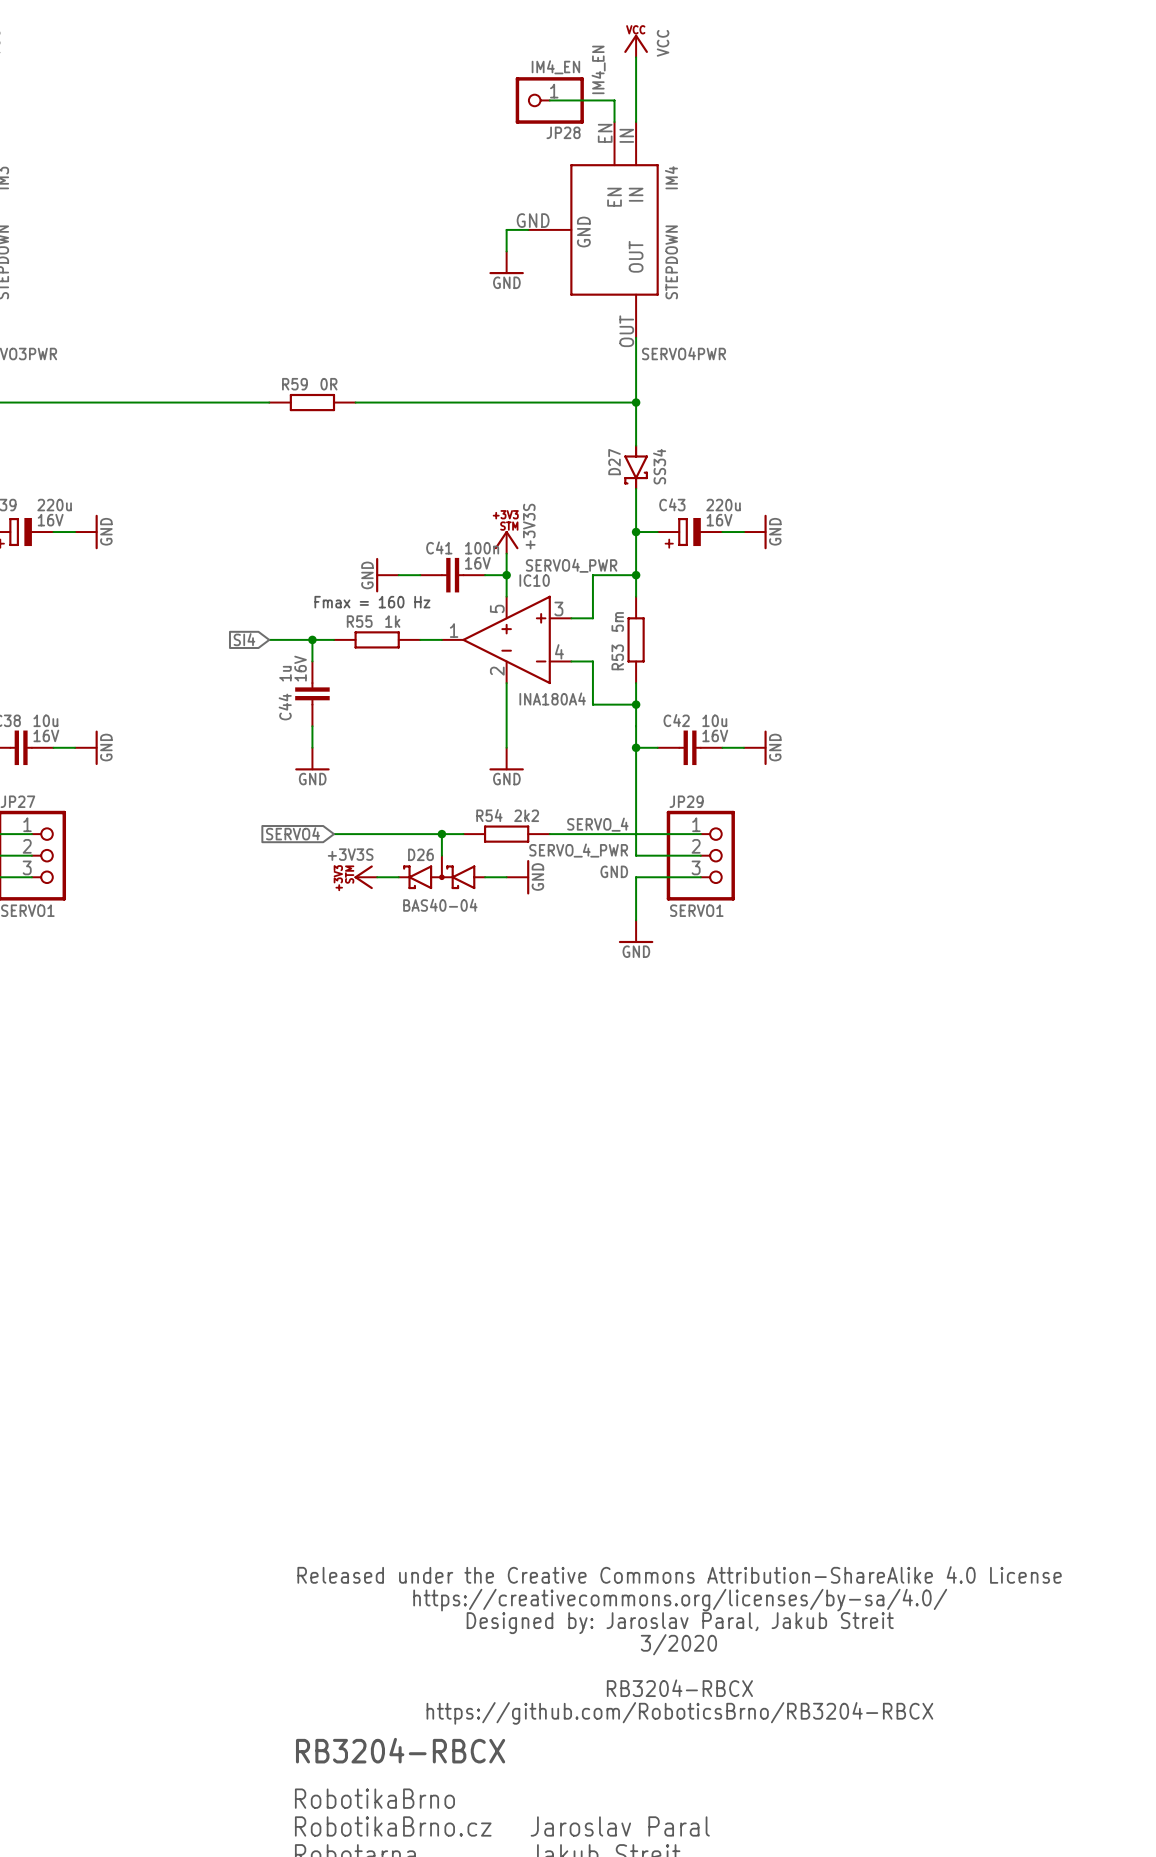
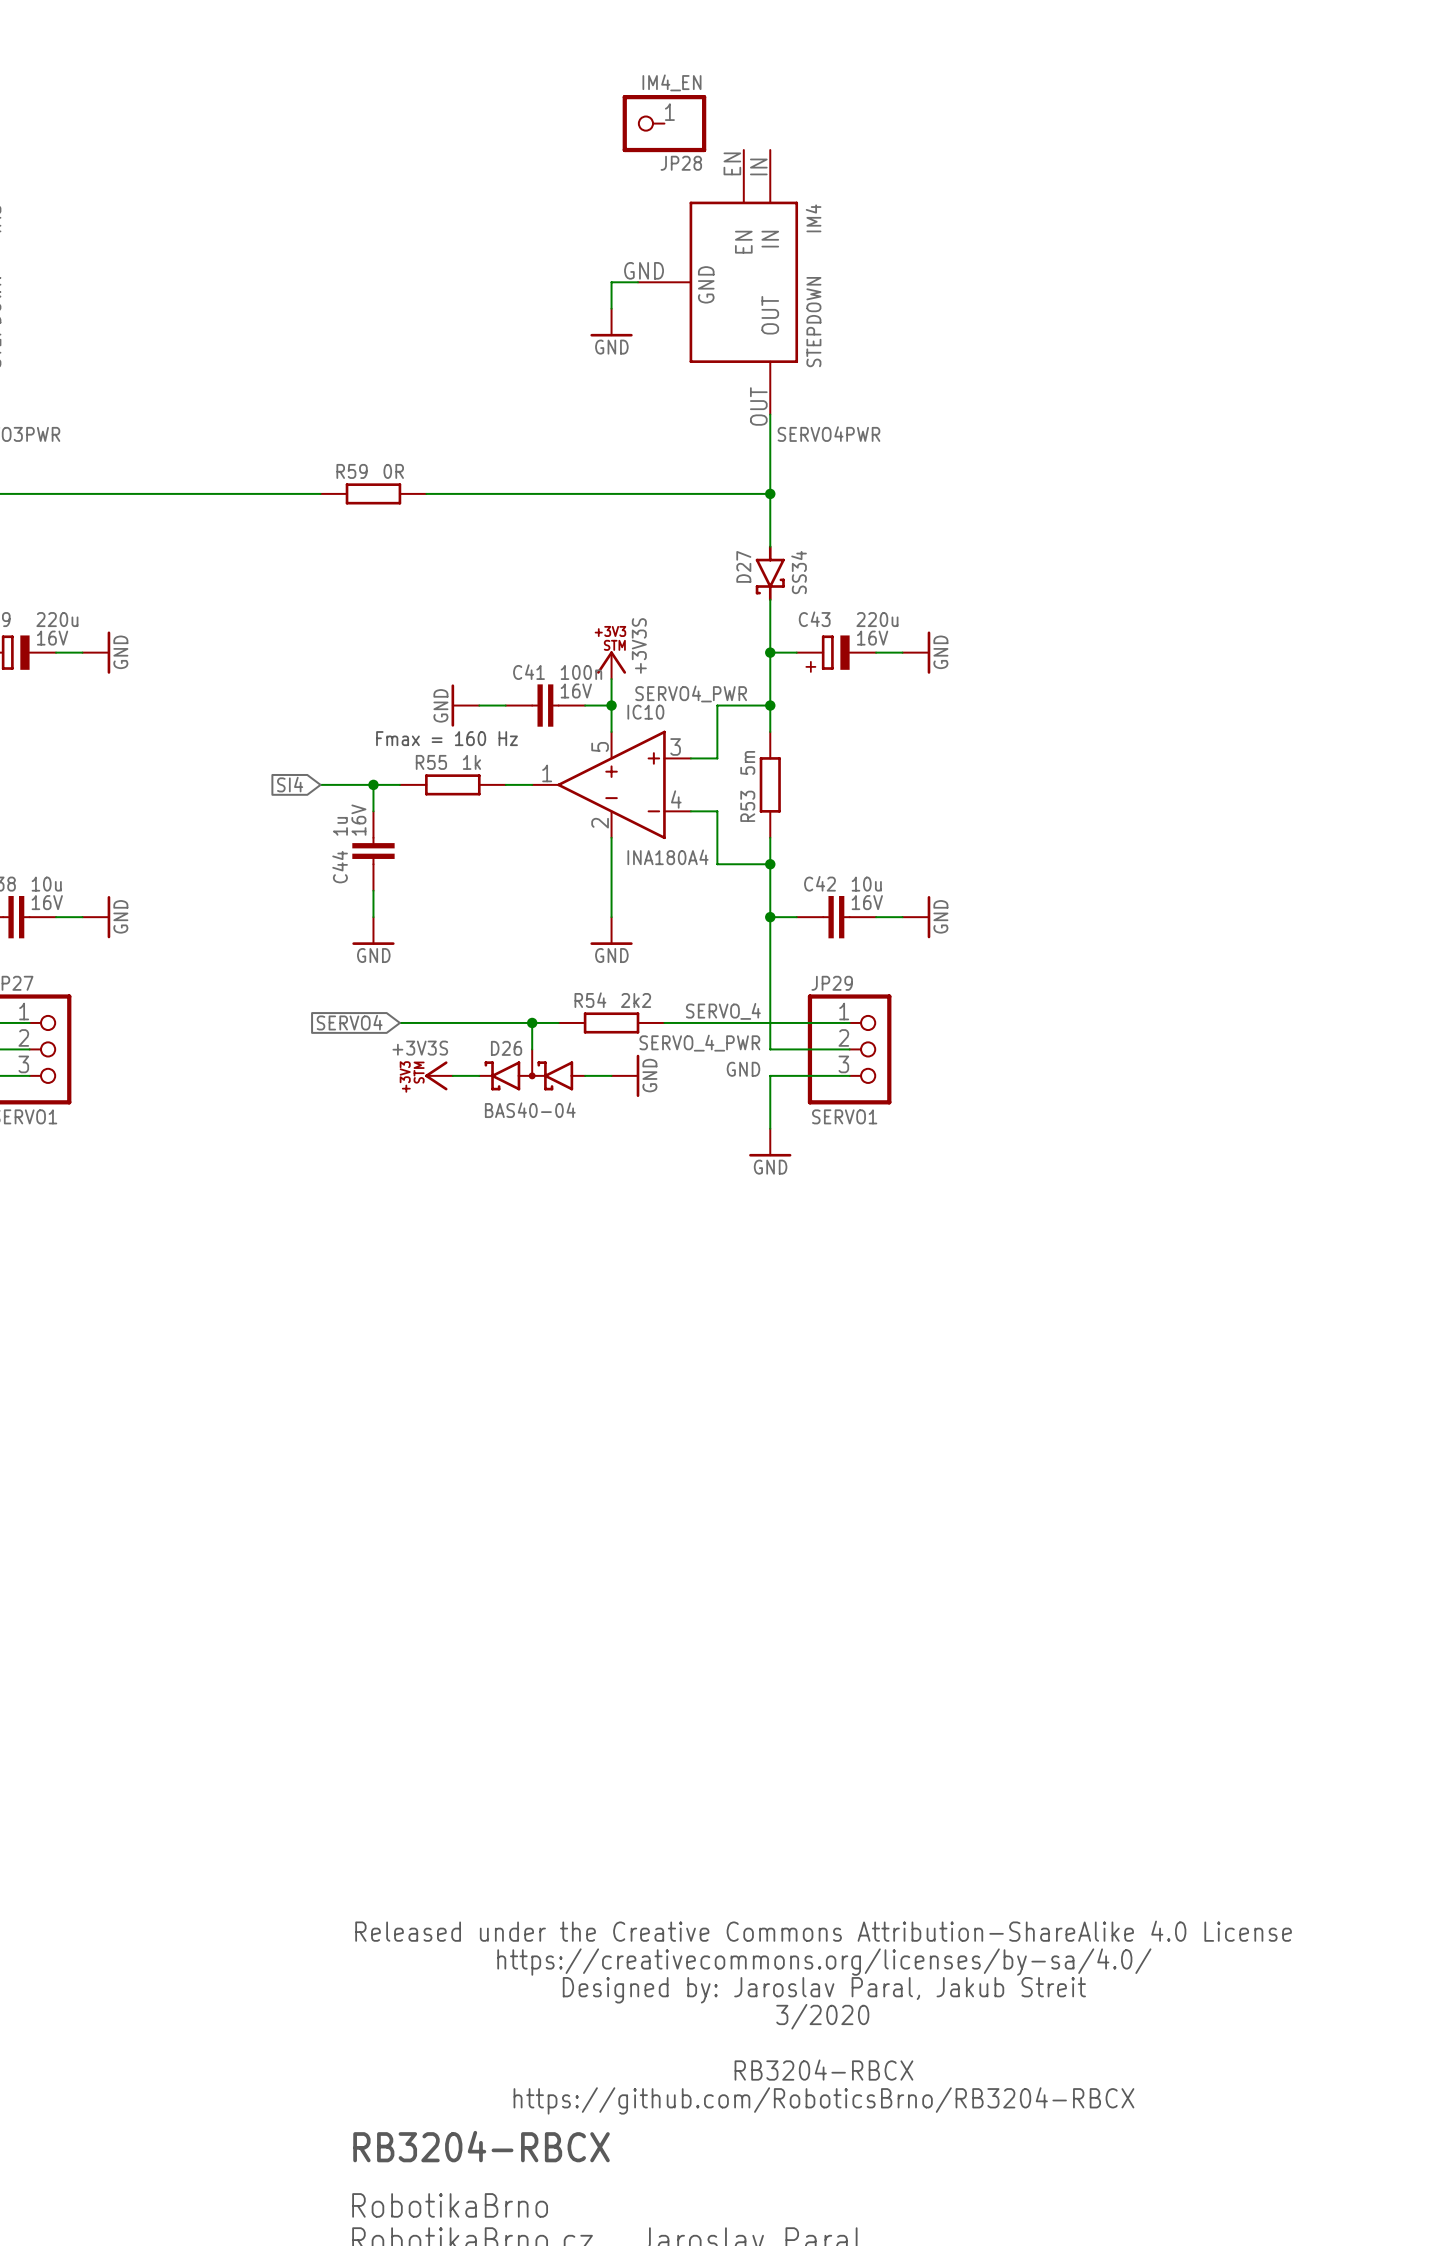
power symbol: VCC (636, 45) -> none
wire: (636, 57) (636, 122) -> none
label: IM4_EN (598, 69) -> none
wire: (549, 100) (614, 100) (614, 122) -> none

